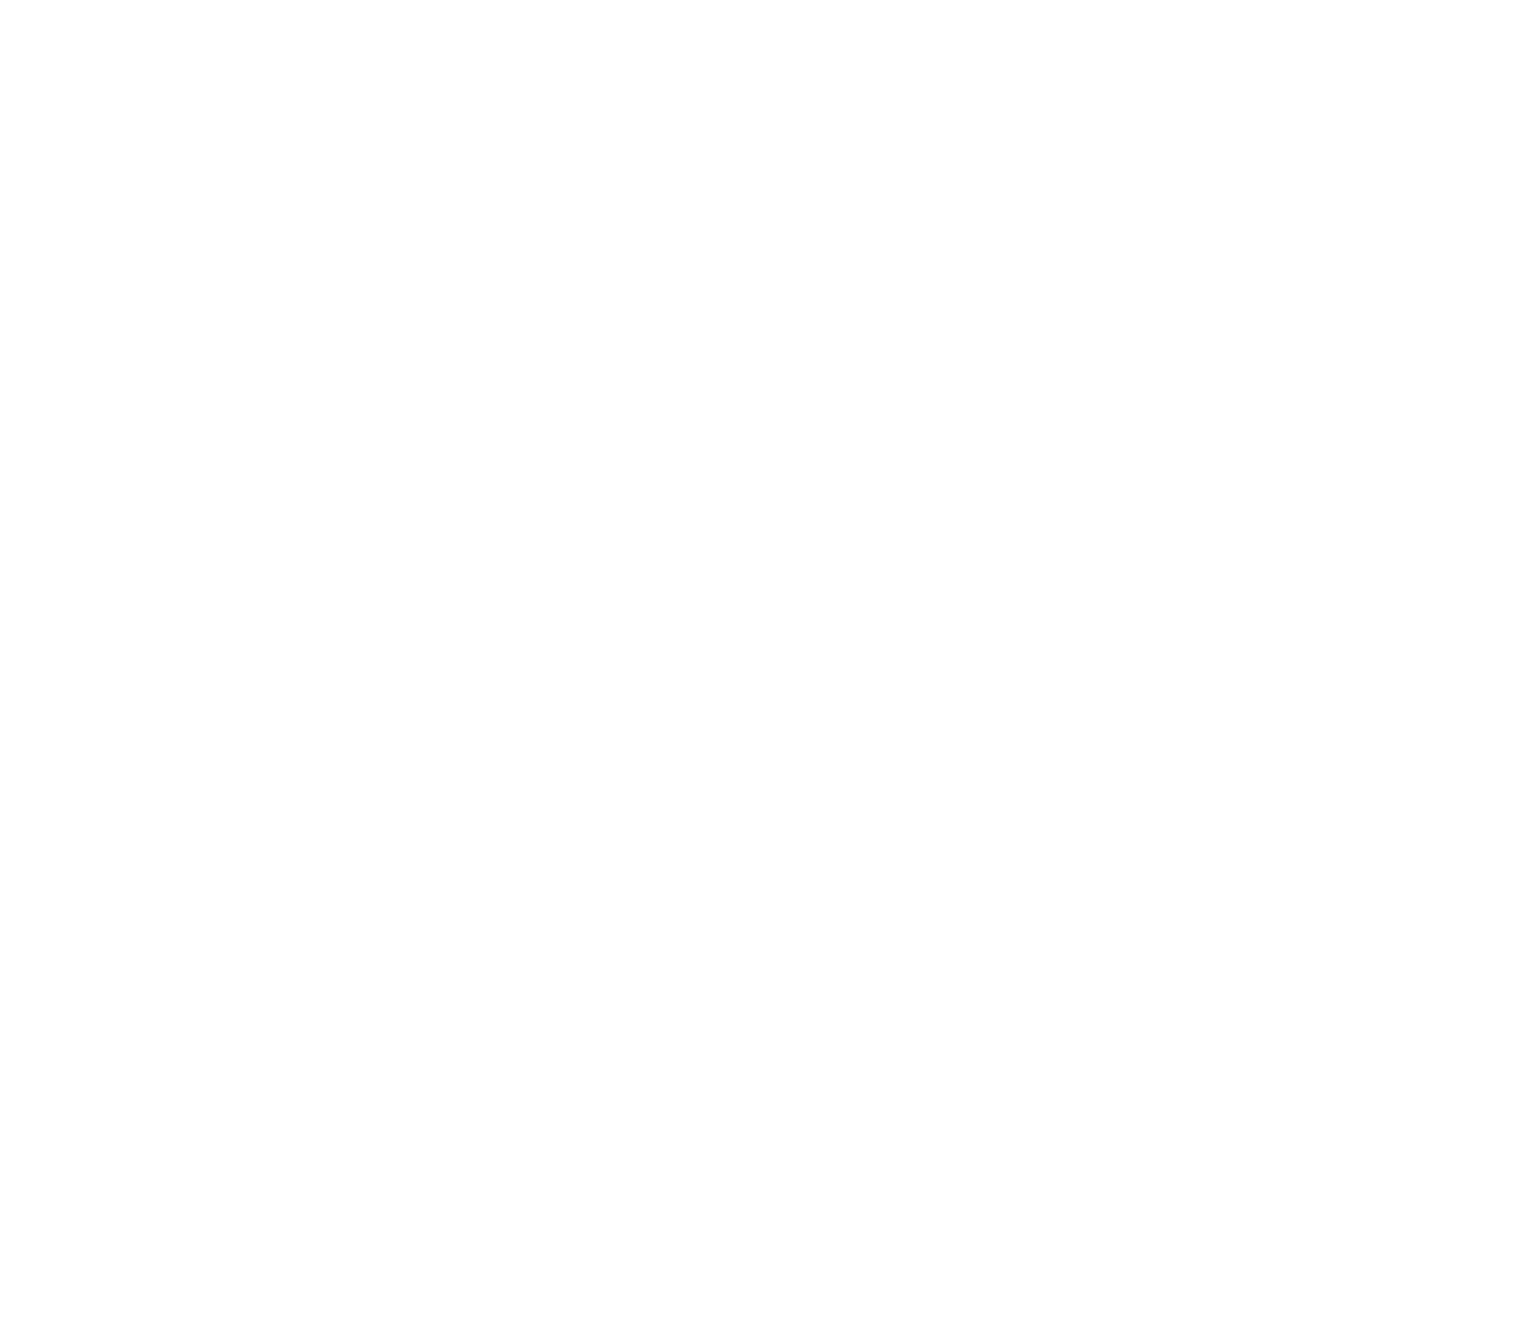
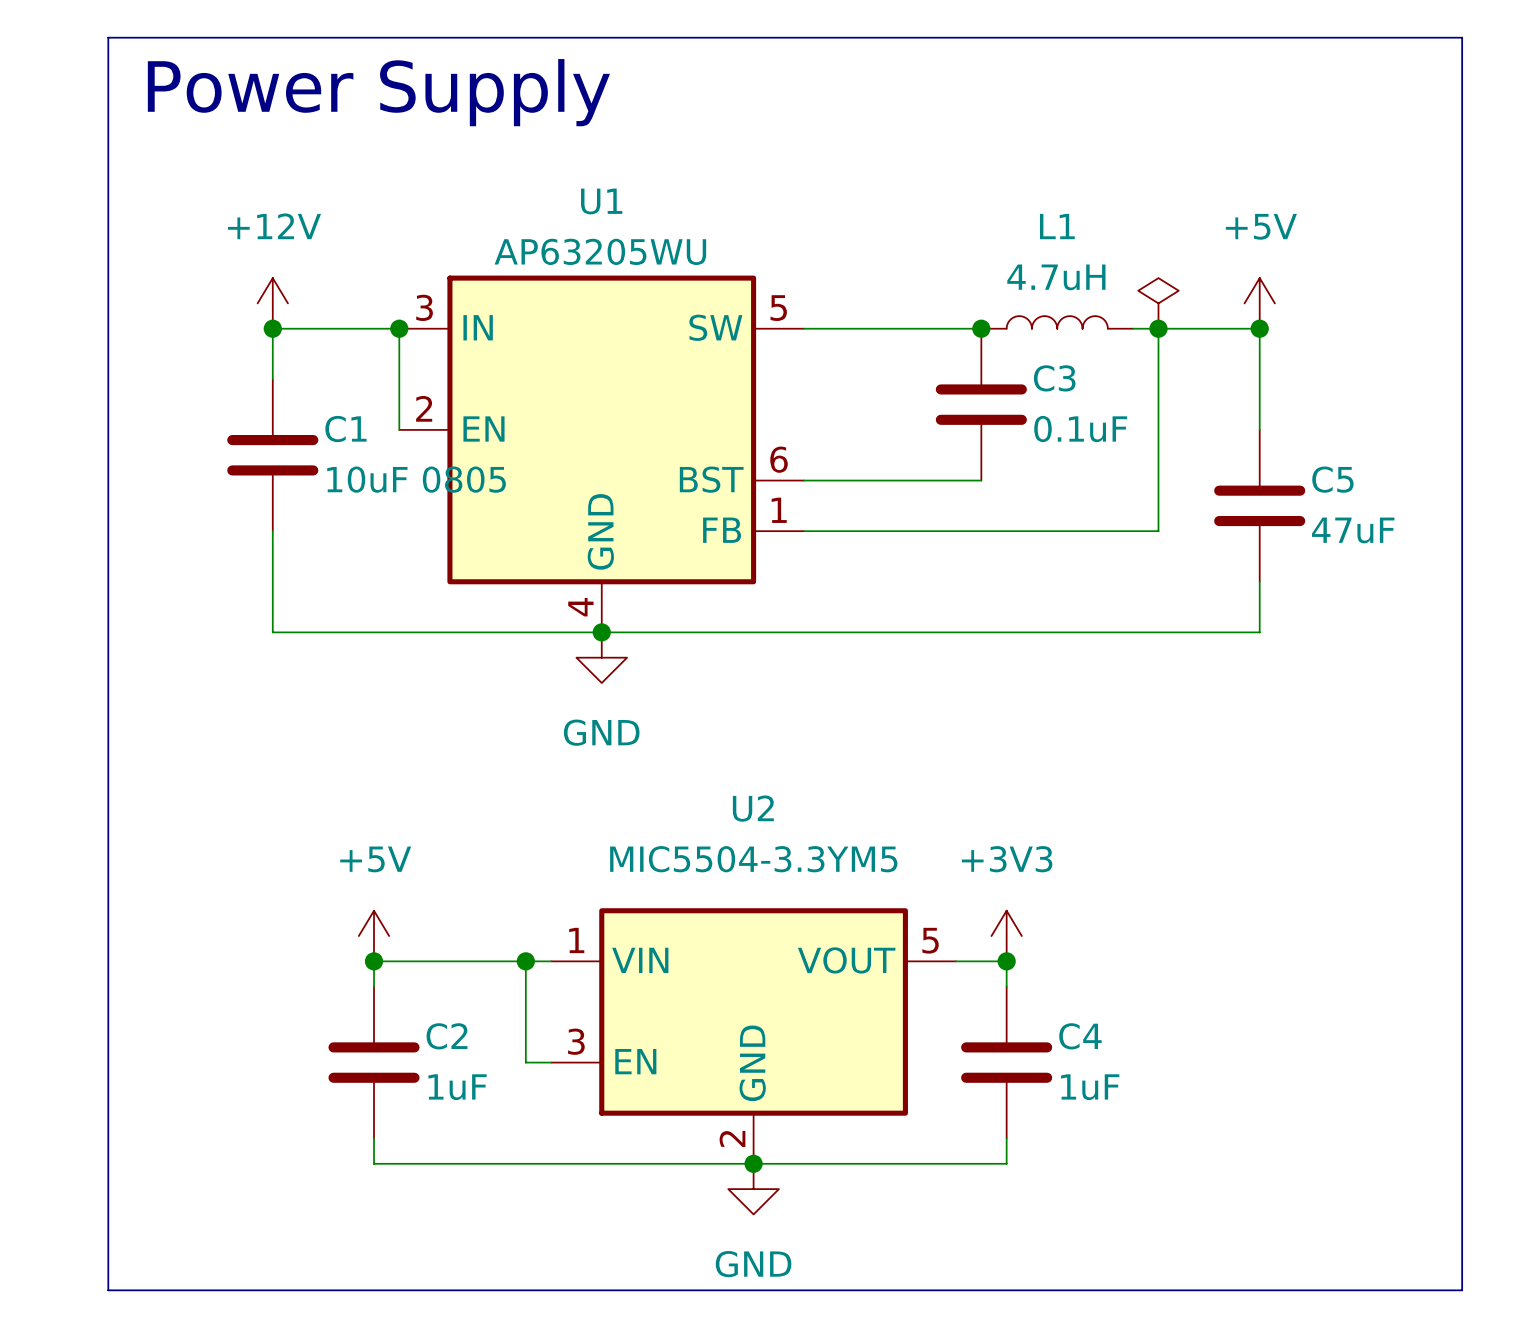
line: none -> (108, 37) (1462, 37) (1462, 1290) (108, 1290) (108, 37)
text: none -> Power Supply (378, 92)
power symbol: none -> +12V (272, 303)
power symbol: none -> (1158, 303)
power symbol: none -> +5V (1259, 303)
L1: none -> 4.7uH (1057, 322)
junction: none -> (272, 328)
junction: none -> (399, 328)
wire: none -> (804, 328) (981, 328)
junction: none -> (981, 328)
wire: none -> (1133, 328) (1259, 328) (1259, 429)
wire: none -> (1158, 328) (1158, 531) (804, 531)
junction: none -> (1158, 328)
junction: none -> (1259, 328)
wire: none -> (272, 379) (272, 328) (399, 328) (399, 429)
C3: none -> 0.1uF (981, 404)
U1: none -> AP63205WU (601, 453)
C1: none -> 10uF 0805 (272, 455)
wire: none -> (804, 480) (981, 480)
C5: none -> 47uF (1259, 505)
wire: none -> (272, 531) (272, 632) (1259, 632) (1259, 581)
junction: none -> (601, 632)
power symbol: none -> GND (601, 657)
power symbol: none -> +5V (374, 936)
power symbol: none -> +3V3 (1006, 936)
junction: none -> (374, 961)
wire: none -> (525, 961) (525, 1062) (551, 1062)
junction: none -> (525, 961)
wire: none -> (551, 961) (374, 961) (374, 986)
wire: none -> (956, 961) (1006, 961) (1006, 986)
junction: none -> (1006, 961)
U2: none -> MIC5504-3.3YM5 (753, 1036)
C2: none -> 1uF (374, 1062)
C4: none -> 1uF (1006, 1062)
wire: none -> (374, 1138) (374, 1163) (1006, 1163) (1006, 1138)
junction: none -> (753, 1163)
power symbol: none -> GND (753, 1189)

